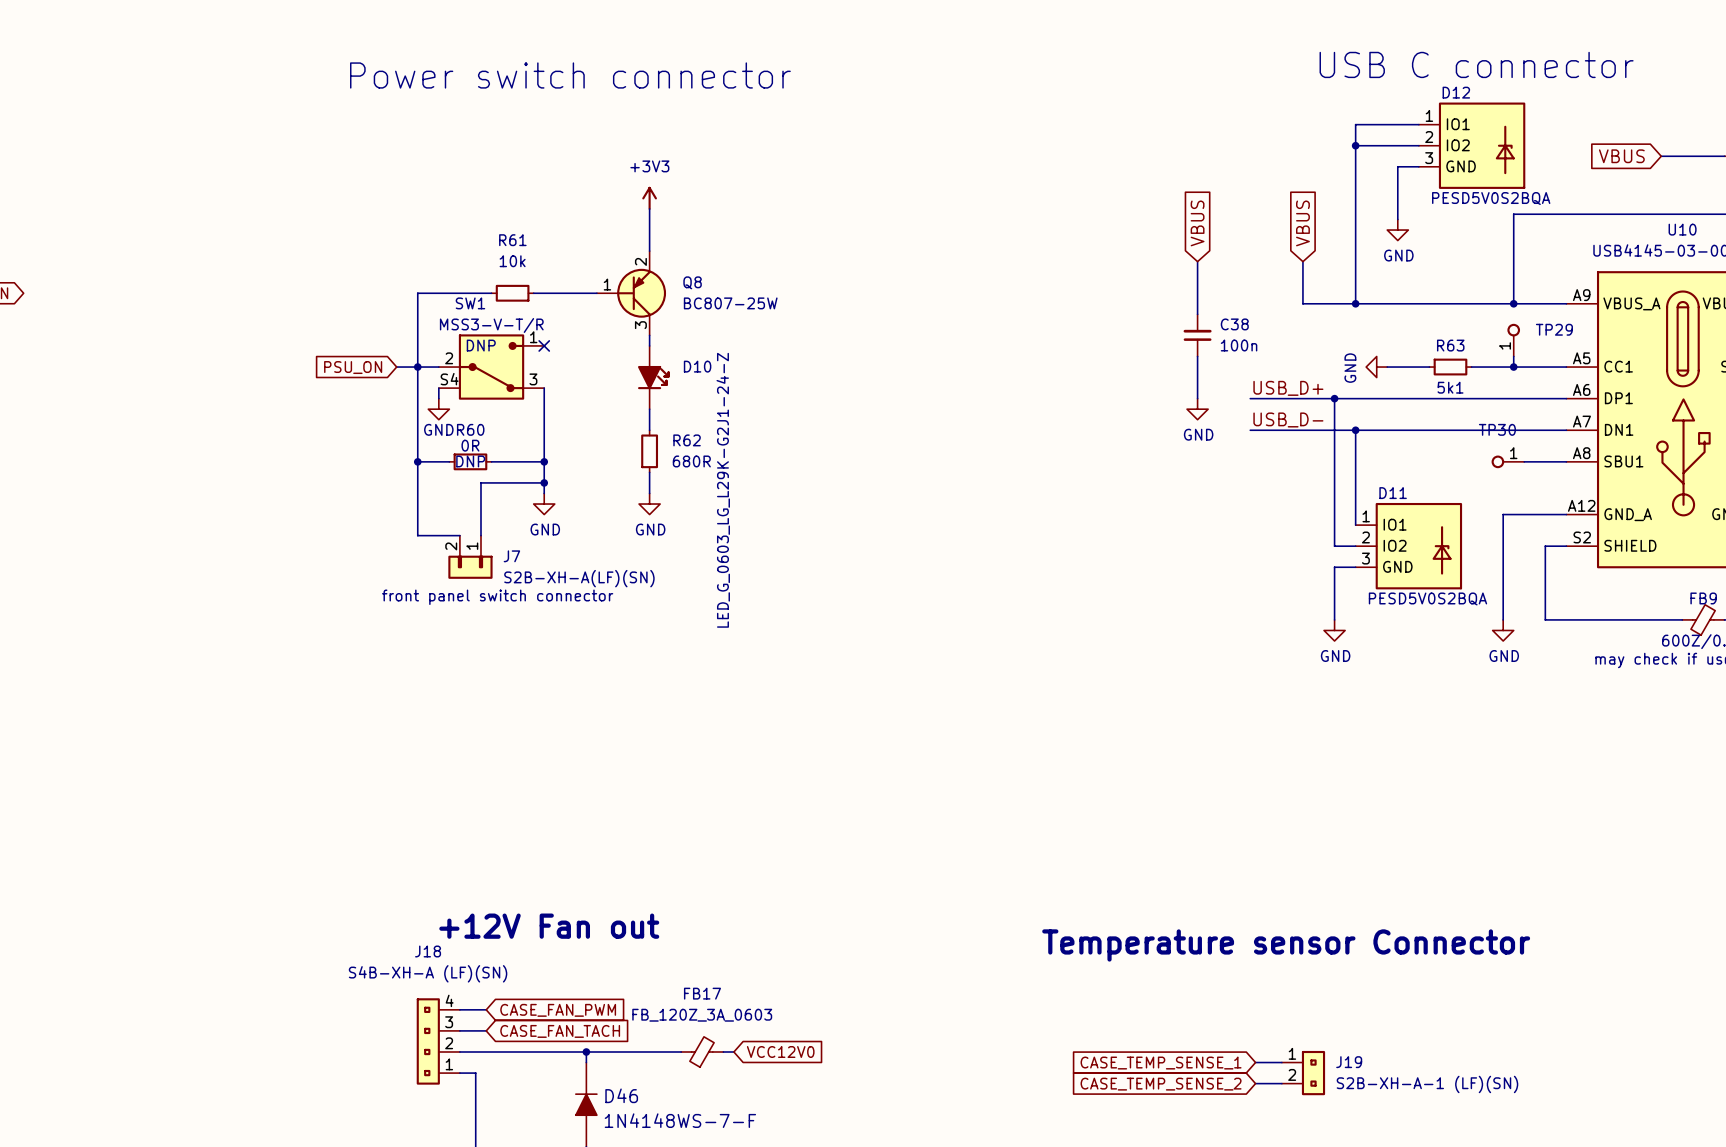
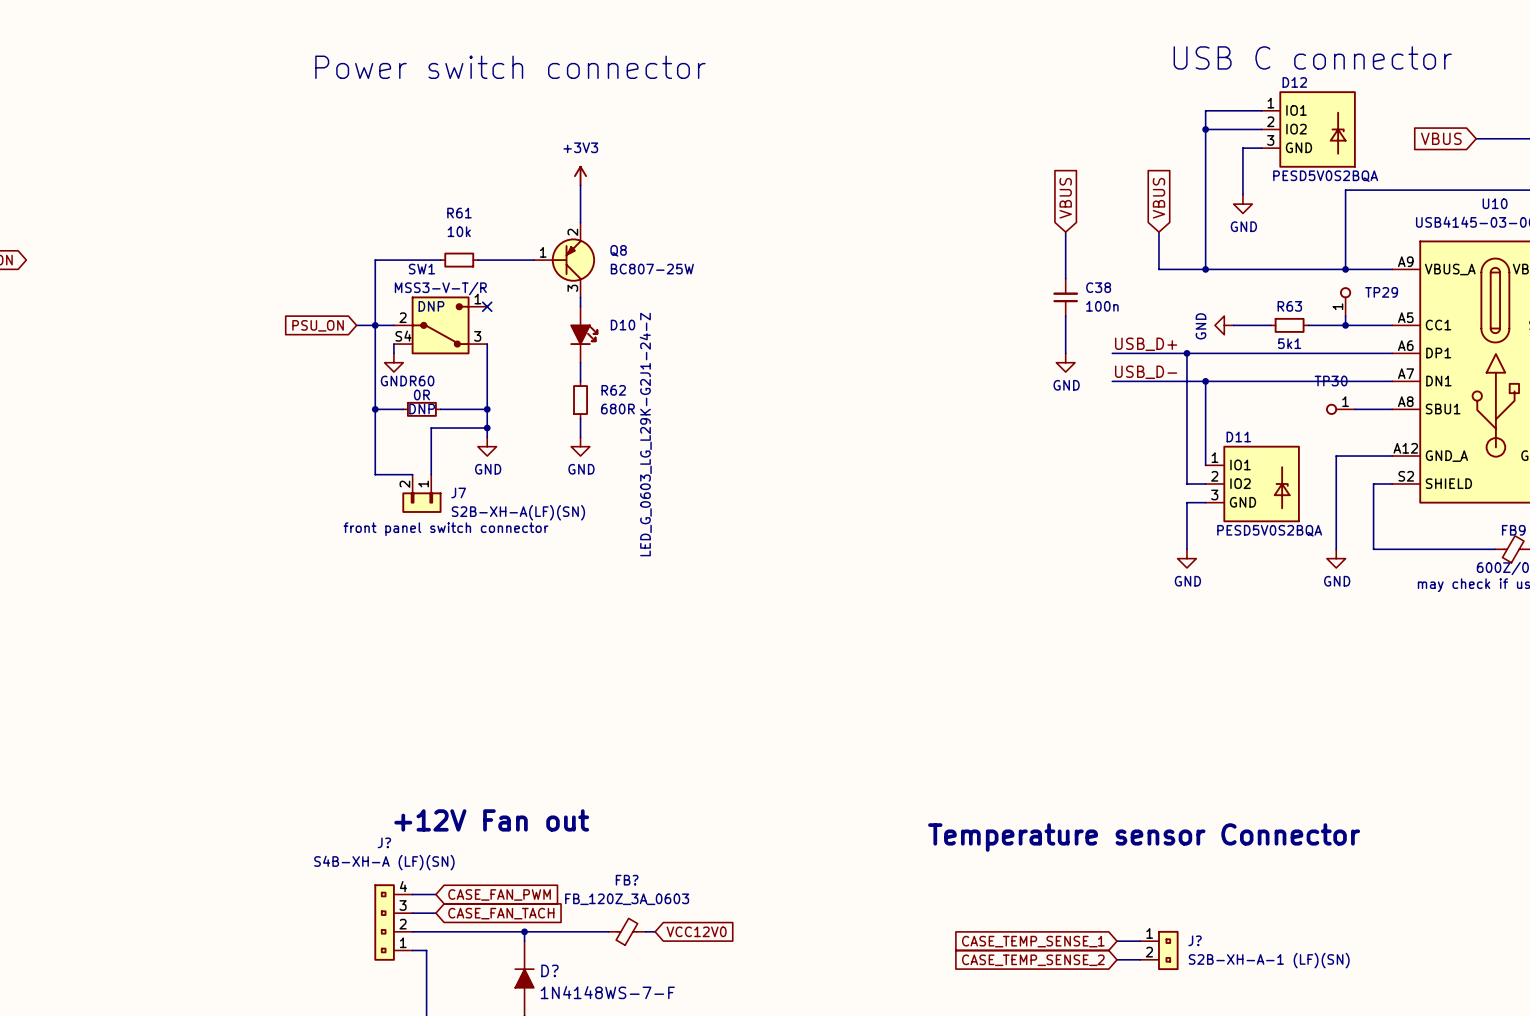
J18 name: J18 (428, 951) -> J? (384, 842)
FB17 name: FB17 (702, 993) -> FB? (627, 880)
J19 name: J19 (1349, 1062) -> J? (1195, 940)
D46 name: D46 (621, 1095) -> D? (549, 970)

